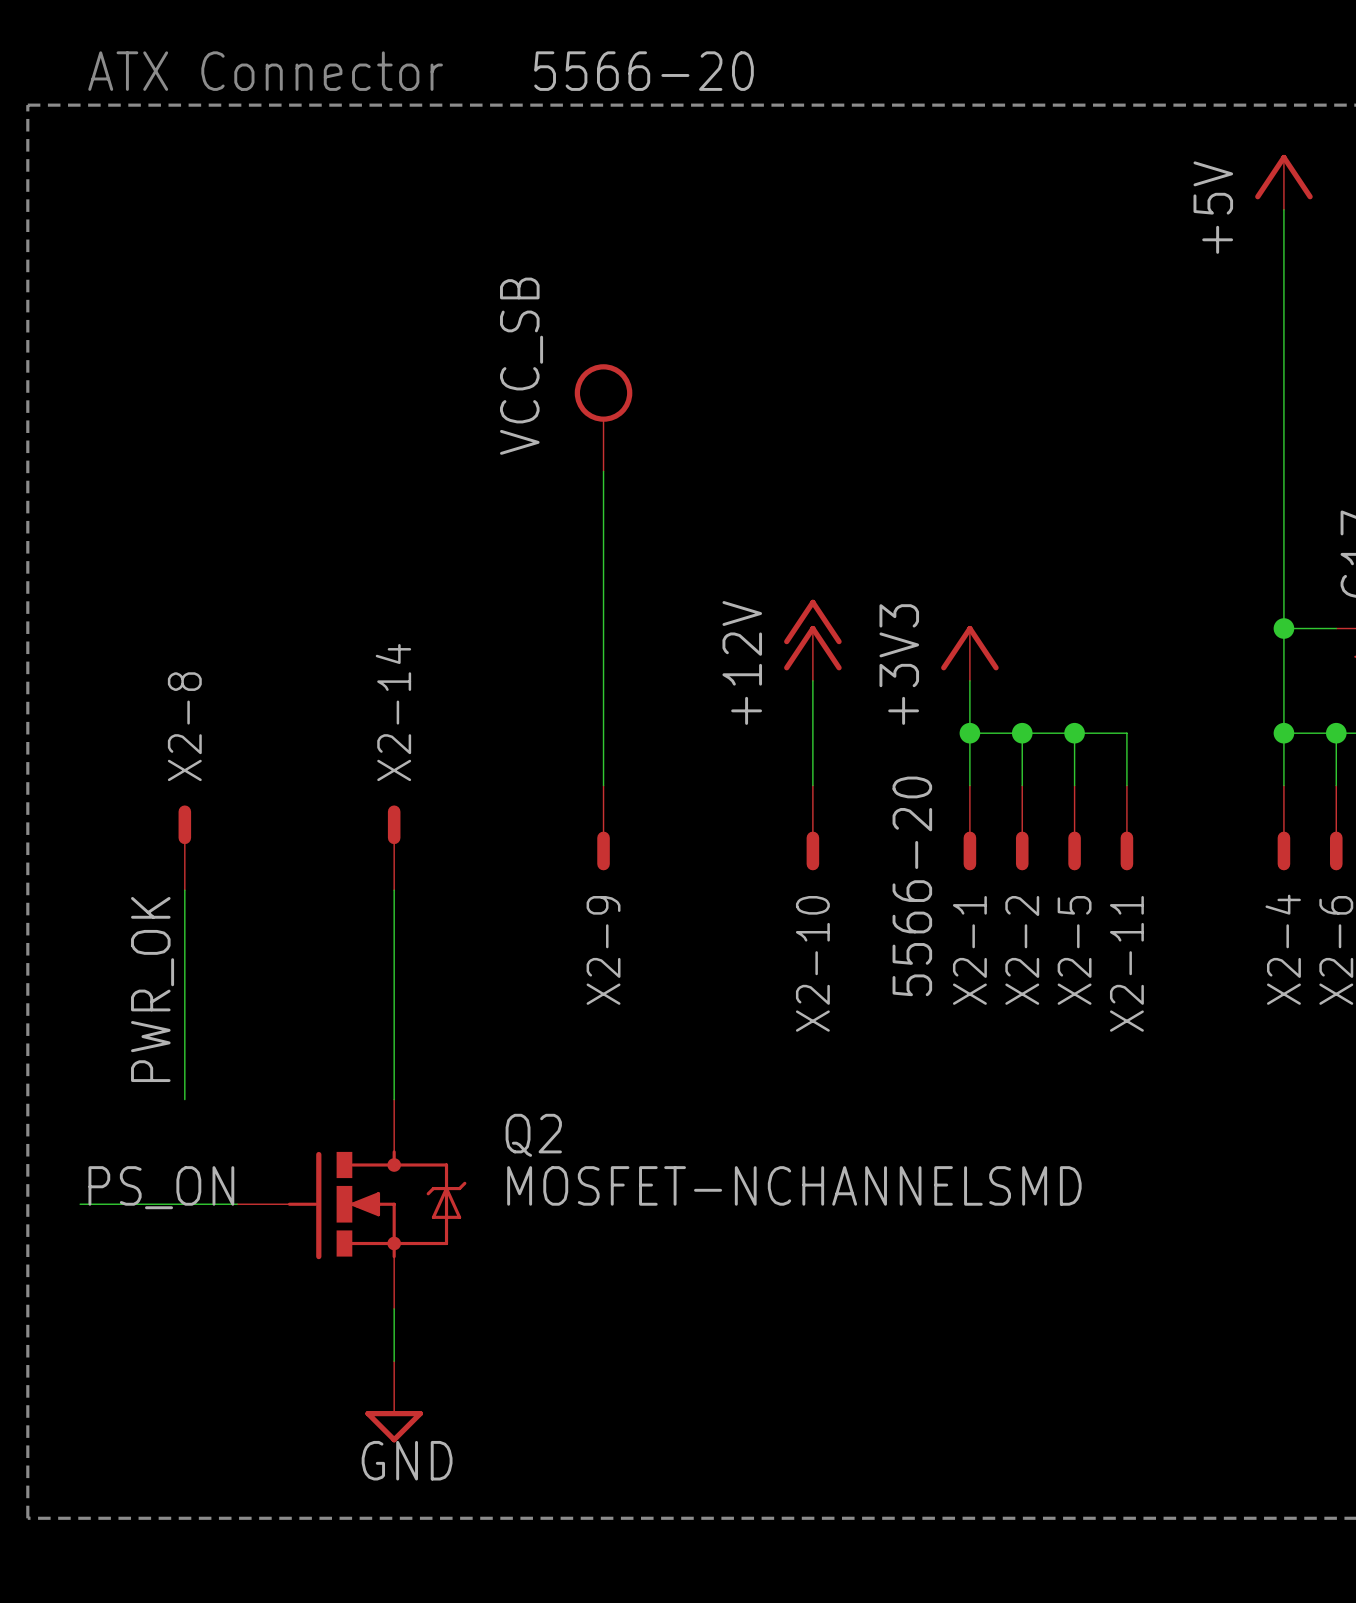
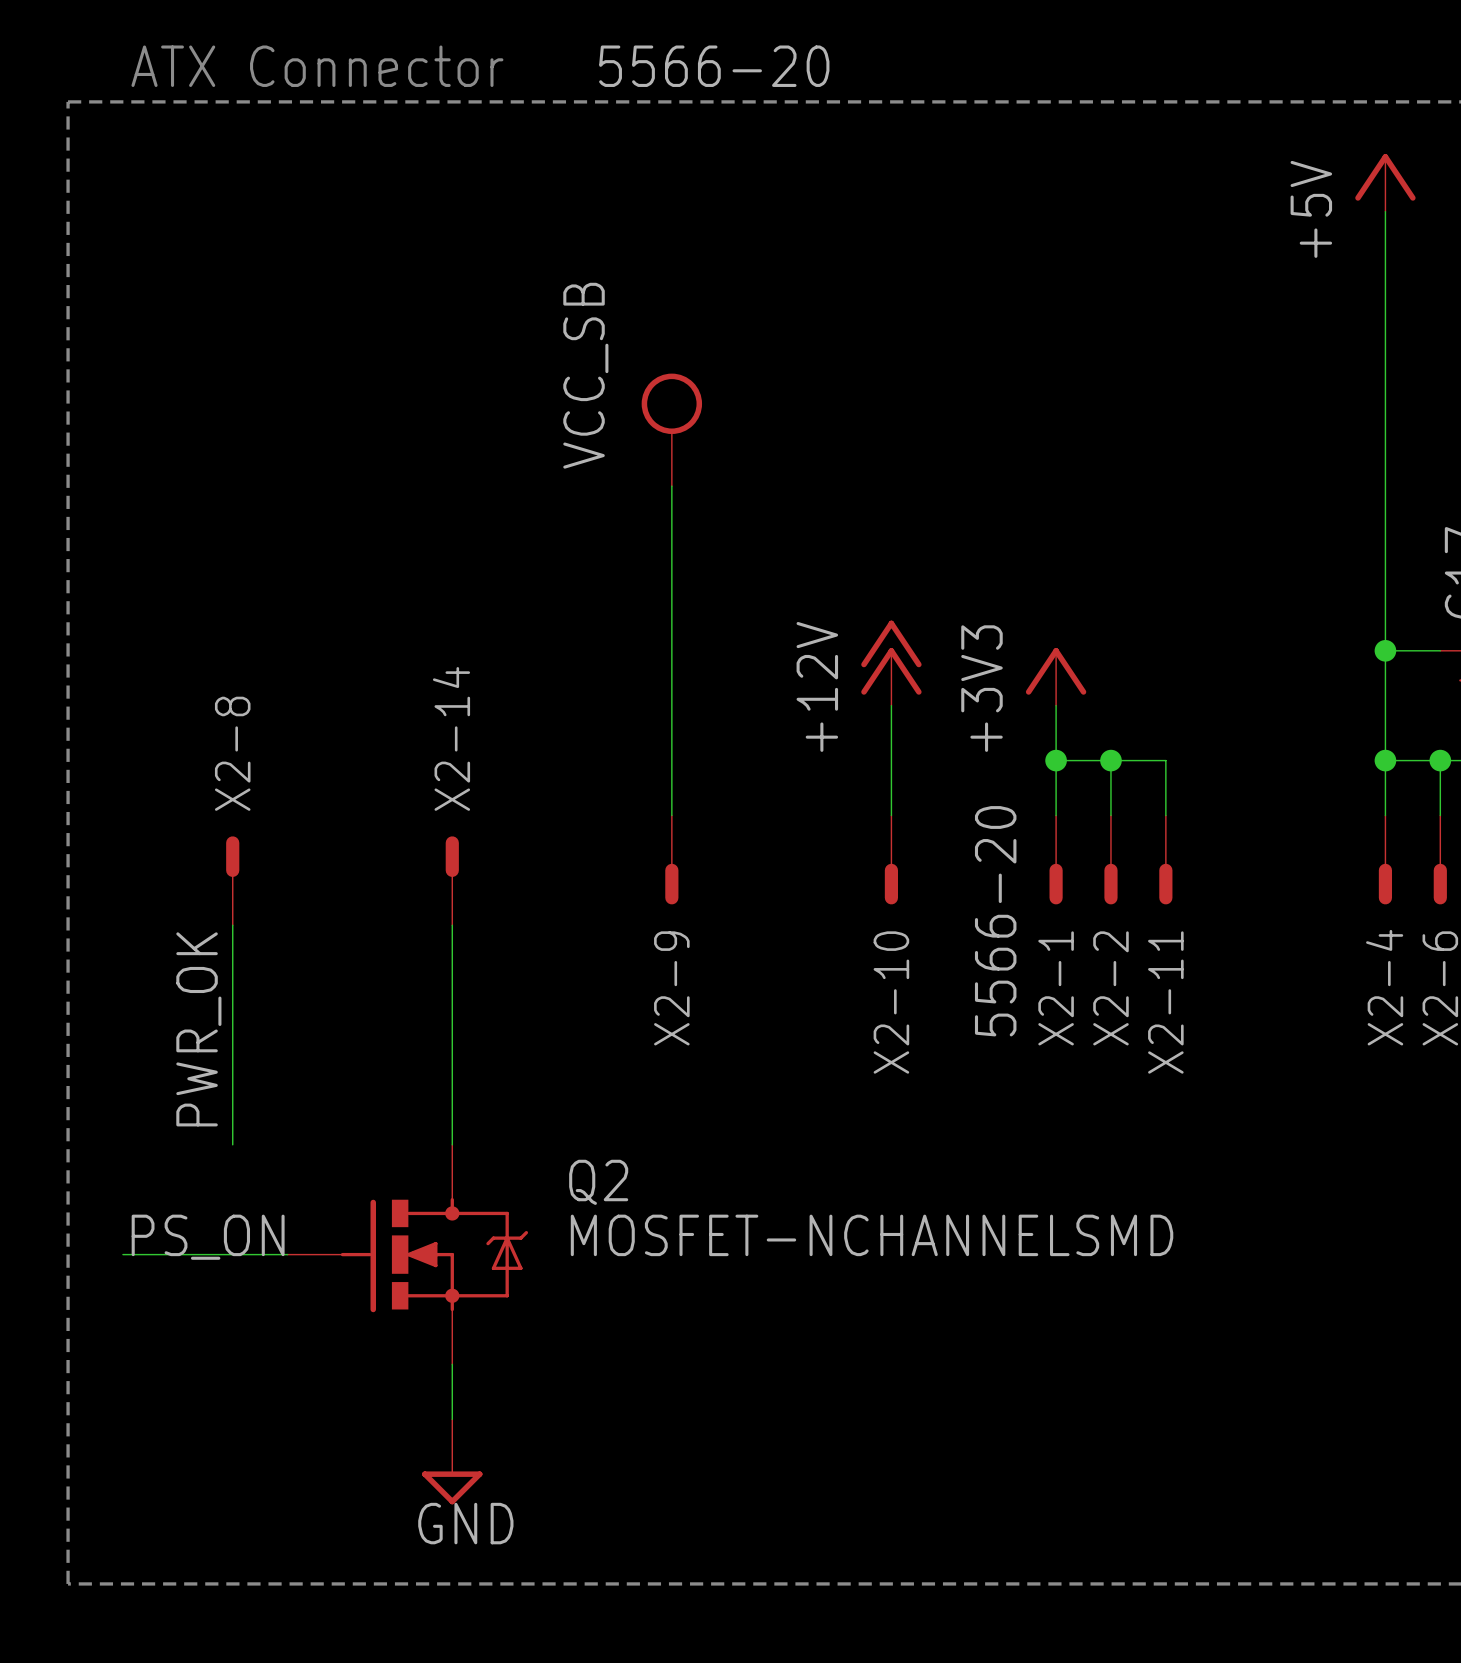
wire: (1074, 733) (1126, 733) (1126, 785) -> none
junction: (1074, 733) -> none
X2-11: (1126, 827) -> none
X2-5 name: X2-5 (1074, 950) -> X2-11 (1165, 1002)

